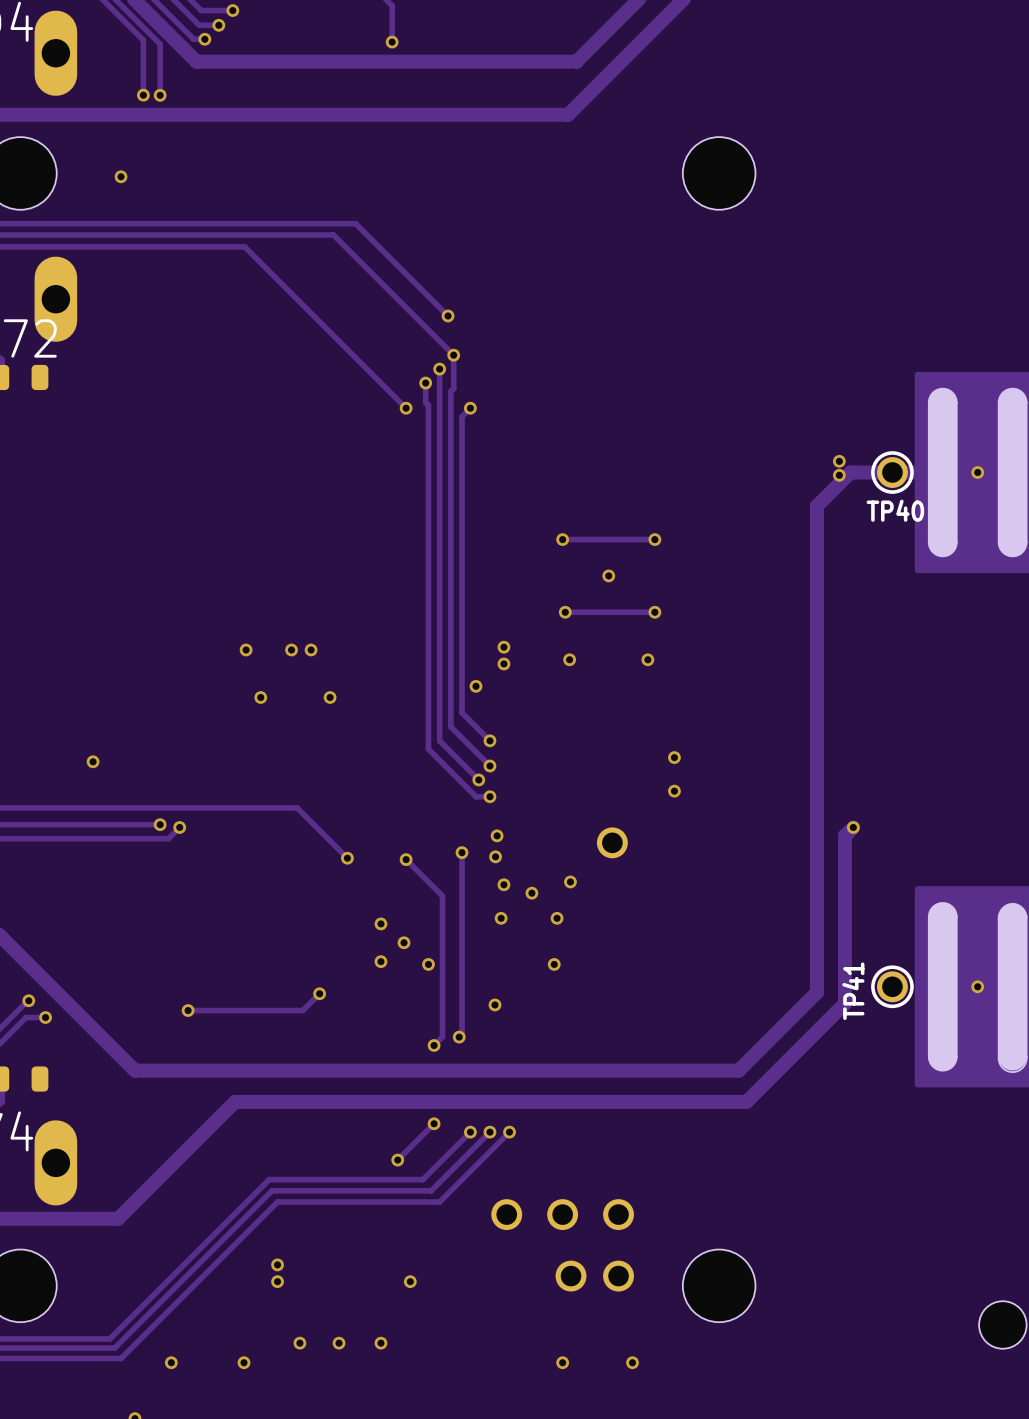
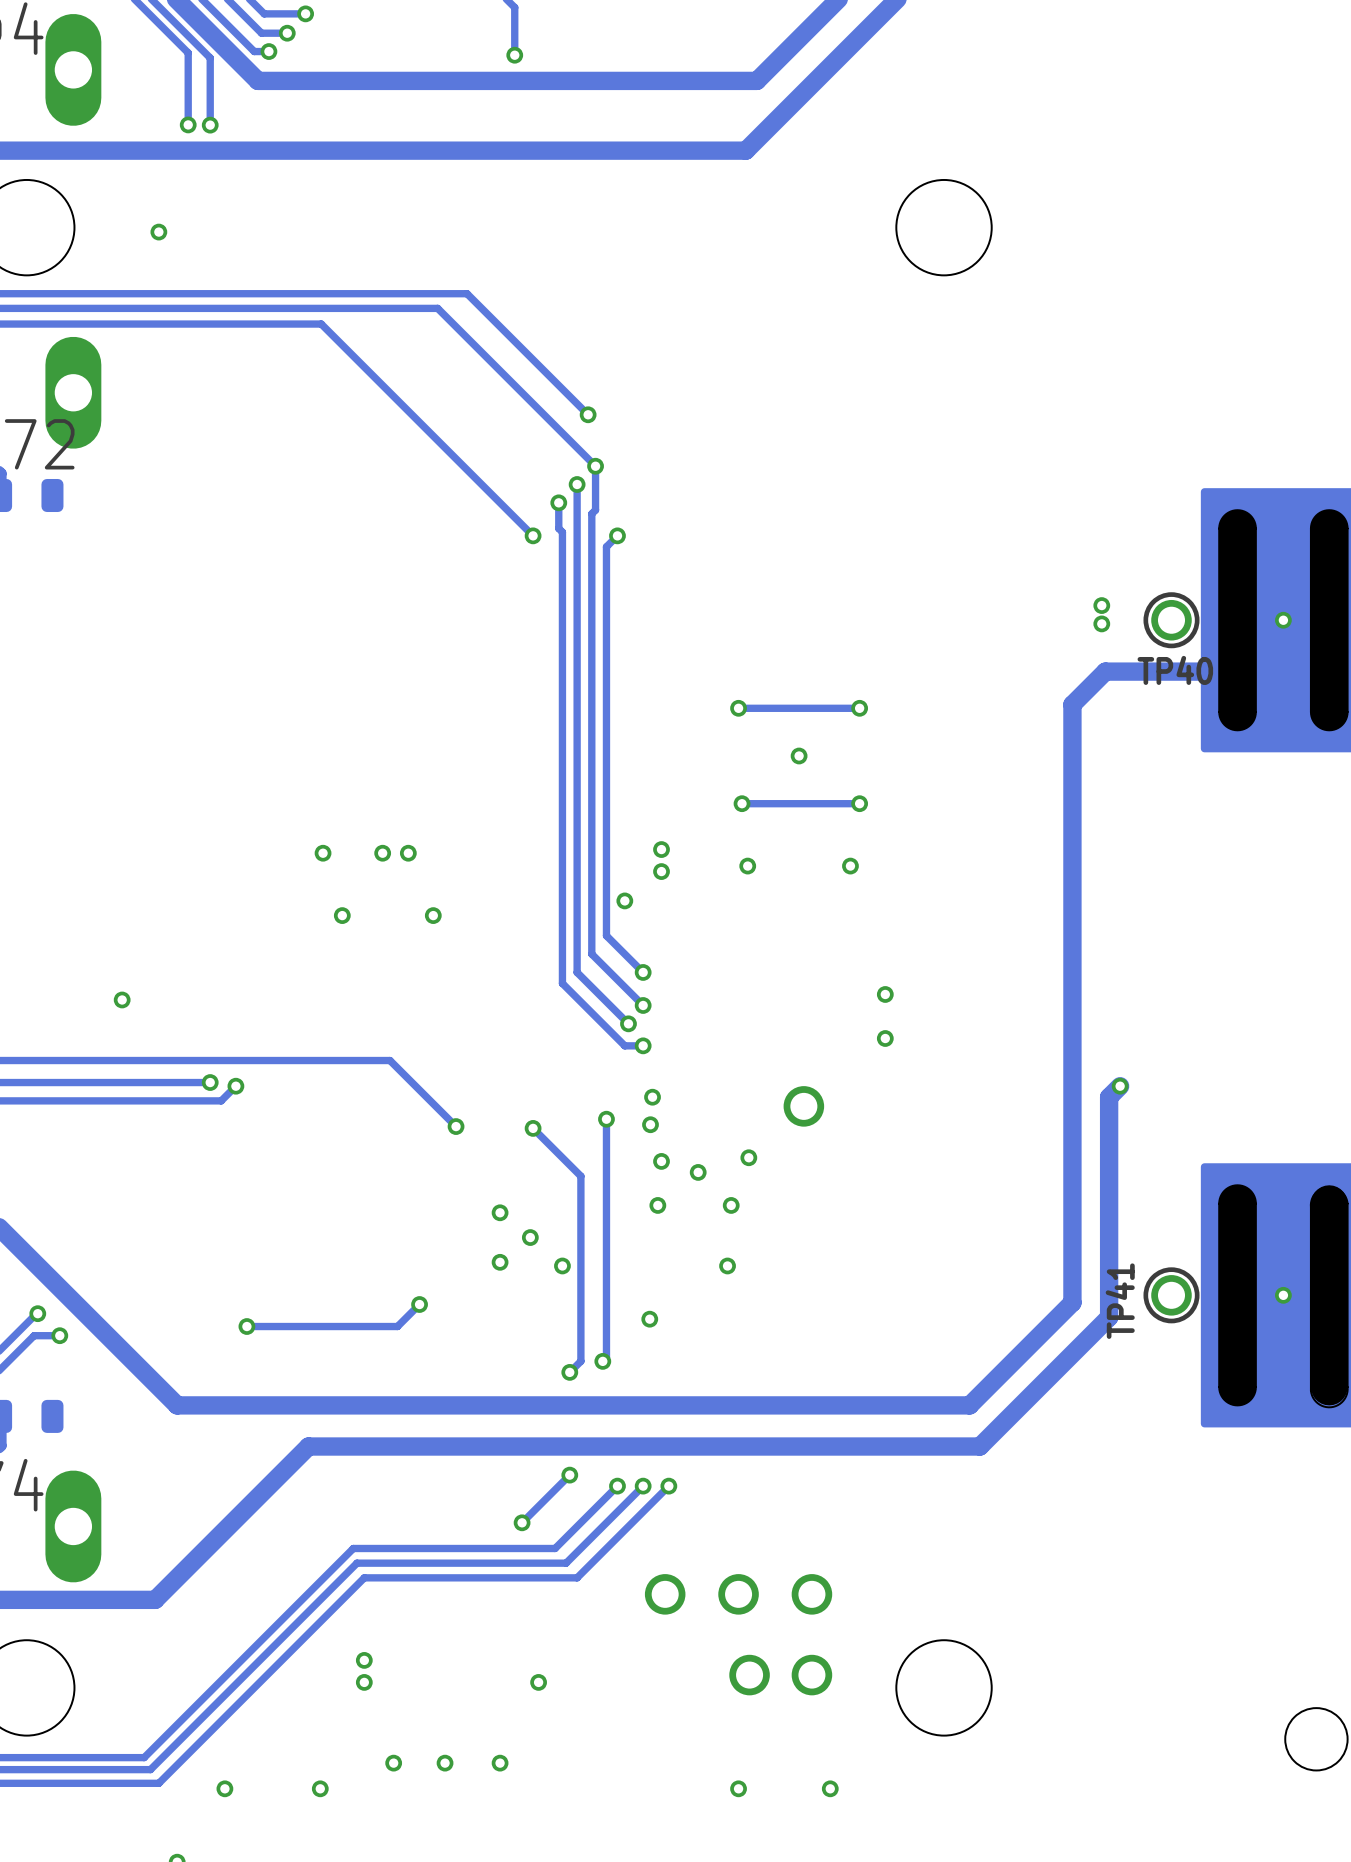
track: (977, 472) (850, 472) (816, 506) (816, 536) -> (1283, 620) (1232, 671) (1105, 671) (1072, 704)

